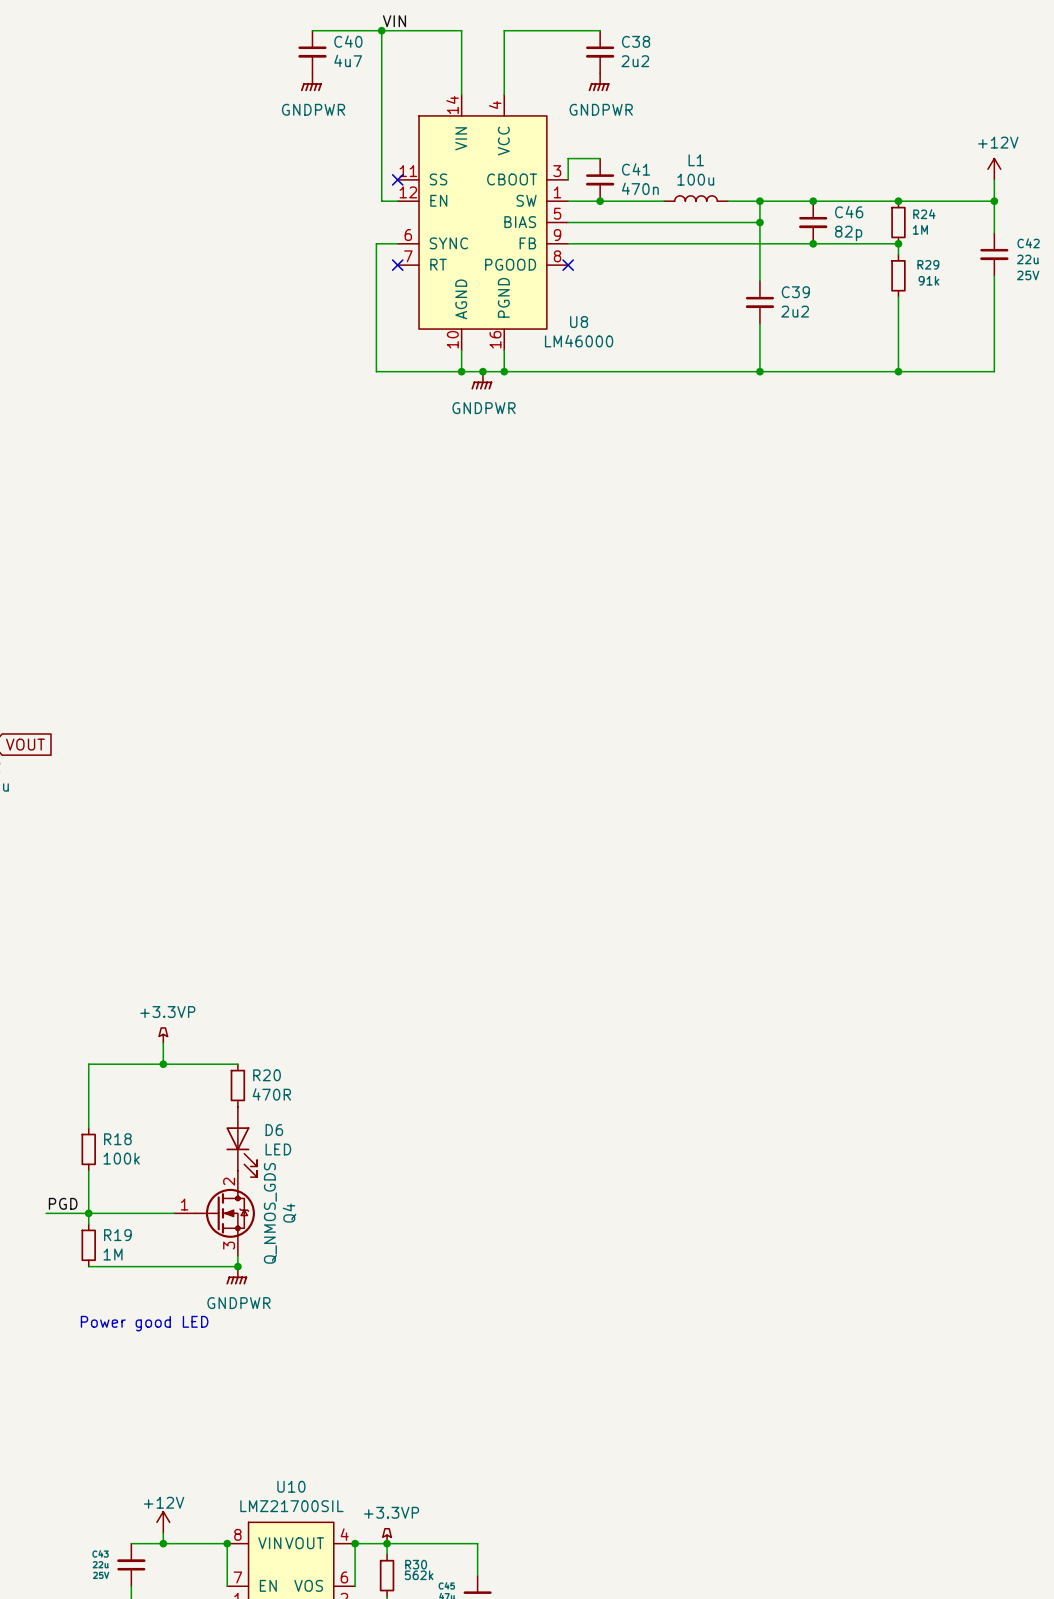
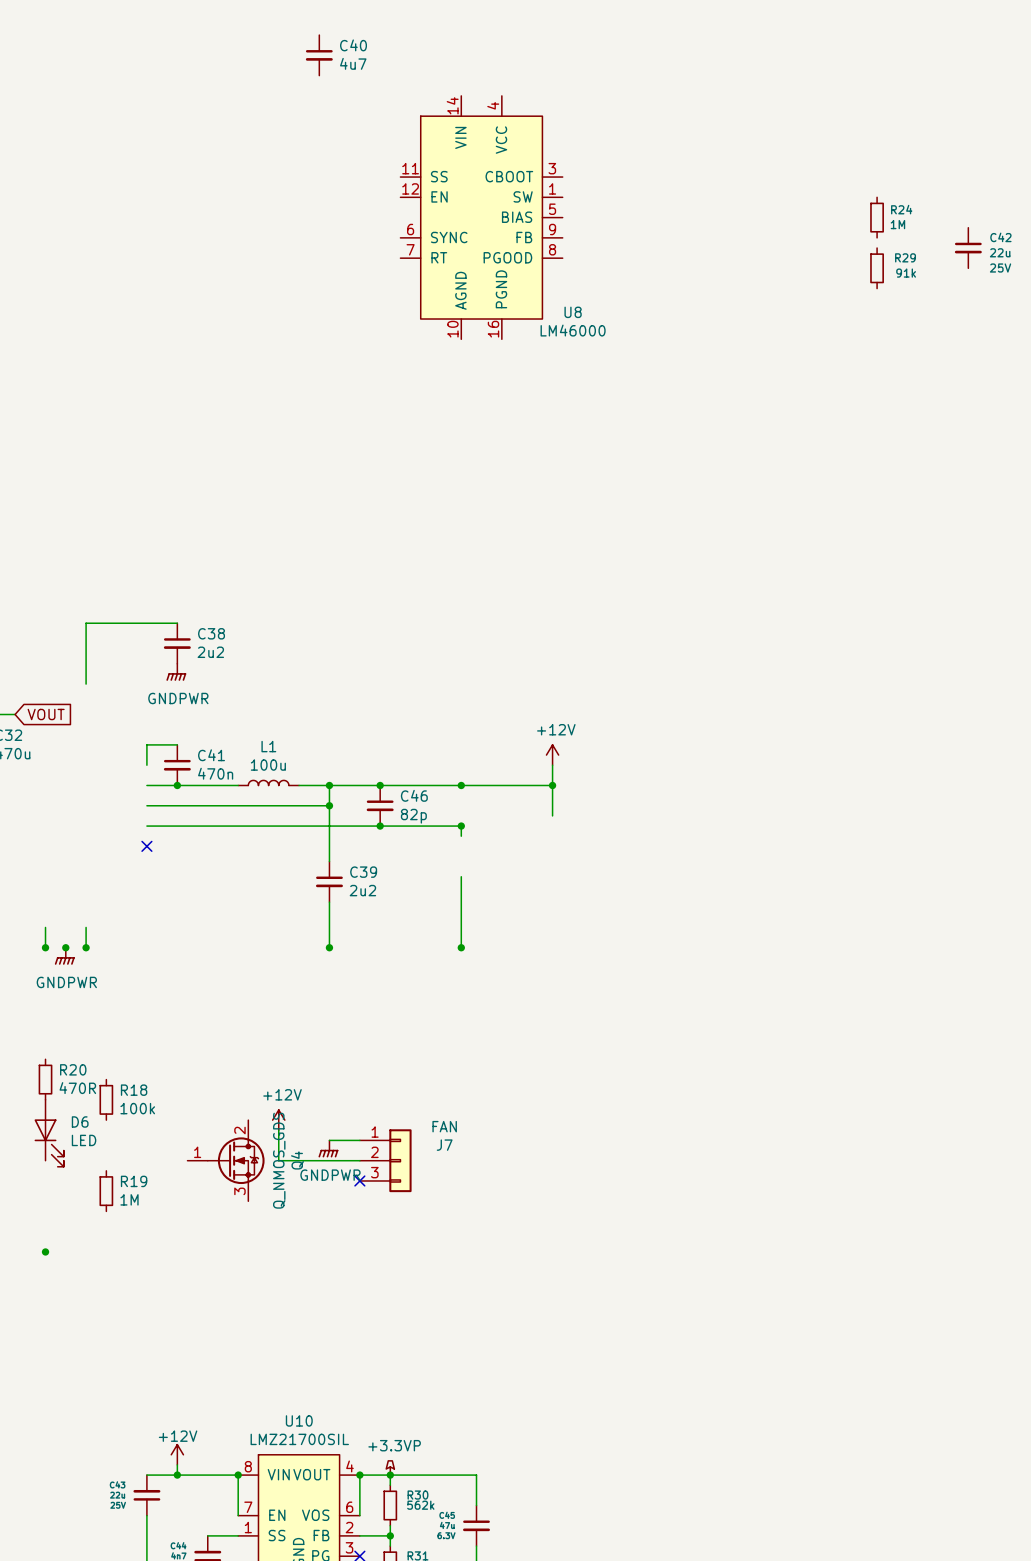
label: VIN (394, 21) -> none
wire: (312, 30) (461, 30) (461, 94) -> none
wire: (381, 30) (381, 201) (397, 201) -> none
junction: (381, 30) -> none
wire: (600, 30) (504, 30) (504, 94) -> none
C38 position: (600, 52) -> (177, 643)
power symbol: GNDPWR (311, 82) -> none
power symbol: GNDPWR (599, 82) -> none
wire: (600, 158) (568, 158) (568, 179) -> none
power symbol: +12V (994, 169) -> none
no-connect mark: (397, 179) -> none
C41 position: (600, 179) -> (177, 765)
wire: (994, 179) (994, 233) -> none
L1 position: (696, 198) -> (268, 782)
wire: (568, 201) (664, 201) -> none
junction: (600, 201) -> none
wire: (727, 201) (994, 201) -> none
wire: (759, 201) (759, 281) -> none
junction: (759, 201) -> none
junction: (813, 201) -> none
junction: (898, 201) -> none
junction: (994, 201) -> none
wire: (568, 222) (759, 222) -> none
junction: (759, 222) -> none
C46 position: (813, 222) -> (380, 805)
wire: (397, 243) (376, 243) (376, 371) (994, 371) (994, 275) -> none
wire: (568, 243) (898, 243) (898, 254) -> none
junction: (813, 243) -> none
junction: (898, 243) -> none
no-connect mark: (397, 265) -> none
no-connect mark: (568, 265) -> none
wire: (898, 297) (898, 371) -> none
C39 position: (759, 302) -> (329, 881)
wire: (759, 323) (759, 371) -> none
wire: (461, 350) (461, 371) -> none
wire: (504, 350) (504, 371) -> none
junction: (461, 371) -> none
junction: (482, 371) -> none
junction: (504, 371) -> none
junction: (759, 371) -> none
junction: (898, 371) -> none
power symbol: GNDPWR (481, 380) -> none
wire: none -> (177, 623) (86, 623) (86, 684)
power symbol: none -> GNDPWR (176, 672)
wire: none -> (177, 744) (146, 744) (146, 765)
power symbol: none -> +12V (552, 755)
wire: none -> (552, 765) (552, 815)
wire: none -> (146, 785) (238, 785)
junction: none -> (177, 785)
wire: none -> (299, 785) (552, 785)
wire: none -> (329, 785) (329, 861)
junction: none -> (329, 785)
junction: none -> (380, 785)
junction: none -> (461, 785)
junction: none -> (552, 785)
wire: none -> (146, 805) (329, 805)
junction: none -> (329, 805)
wire: none -> (146, 826) (461, 826) (461, 836)
junction: none -> (380, 826)
junction: none -> (461, 826)
no-connect mark: none -> (146, 846)
wire: none -> (461, 876) (461, 947)
wire: none -> (329, 902) (329, 947)
wire: none -> (45, 927) (45, 947)
junction: none -> (45, 947)
junction: none -> (65, 947)
junction: none -> (86, 947)
junction: none -> (329, 947)
junction: none -> (461, 947)
power symbol: none -> GNDPWR (64, 956)
power symbol: +3.3VP (163, 1035) -> none
wire: (163, 1042) (163, 1064) -> (86, 927) (86, 947)
junction: (163, 1064) -> none
wire: (237, 1064) (88, 1064) (88, 1128) -> none
R20 position: (237, 1085) -> (45, 1079)
D6 position: (241, 1141) -> (49, 1133)
wire: (88, 1170) (88, 1224) -> none
power symbol: none -> +12V (278, 1120)
wire: none -> (278, 1130) (278, 1160) (359, 1160)
wire: none -> (329, 1140) (359, 1140)
label: PGD (63, 1203) -> none
wire: (46, 1213) (173, 1213) -> none
junction: (88, 1213) -> none
J7: none -> FAN (385, 1160)
no-connect mark: none -> (359, 1180)
wire: (237, 1255) (237, 1266) (88, 1266) -> none
junction: (237, 1266) -> none
power symbol position: GNDPWR (236, 1275) -> GNDPWR (328, 1148)
junction: none -> (45, 1251)
text: Power good LED (144, 1323) -> none

